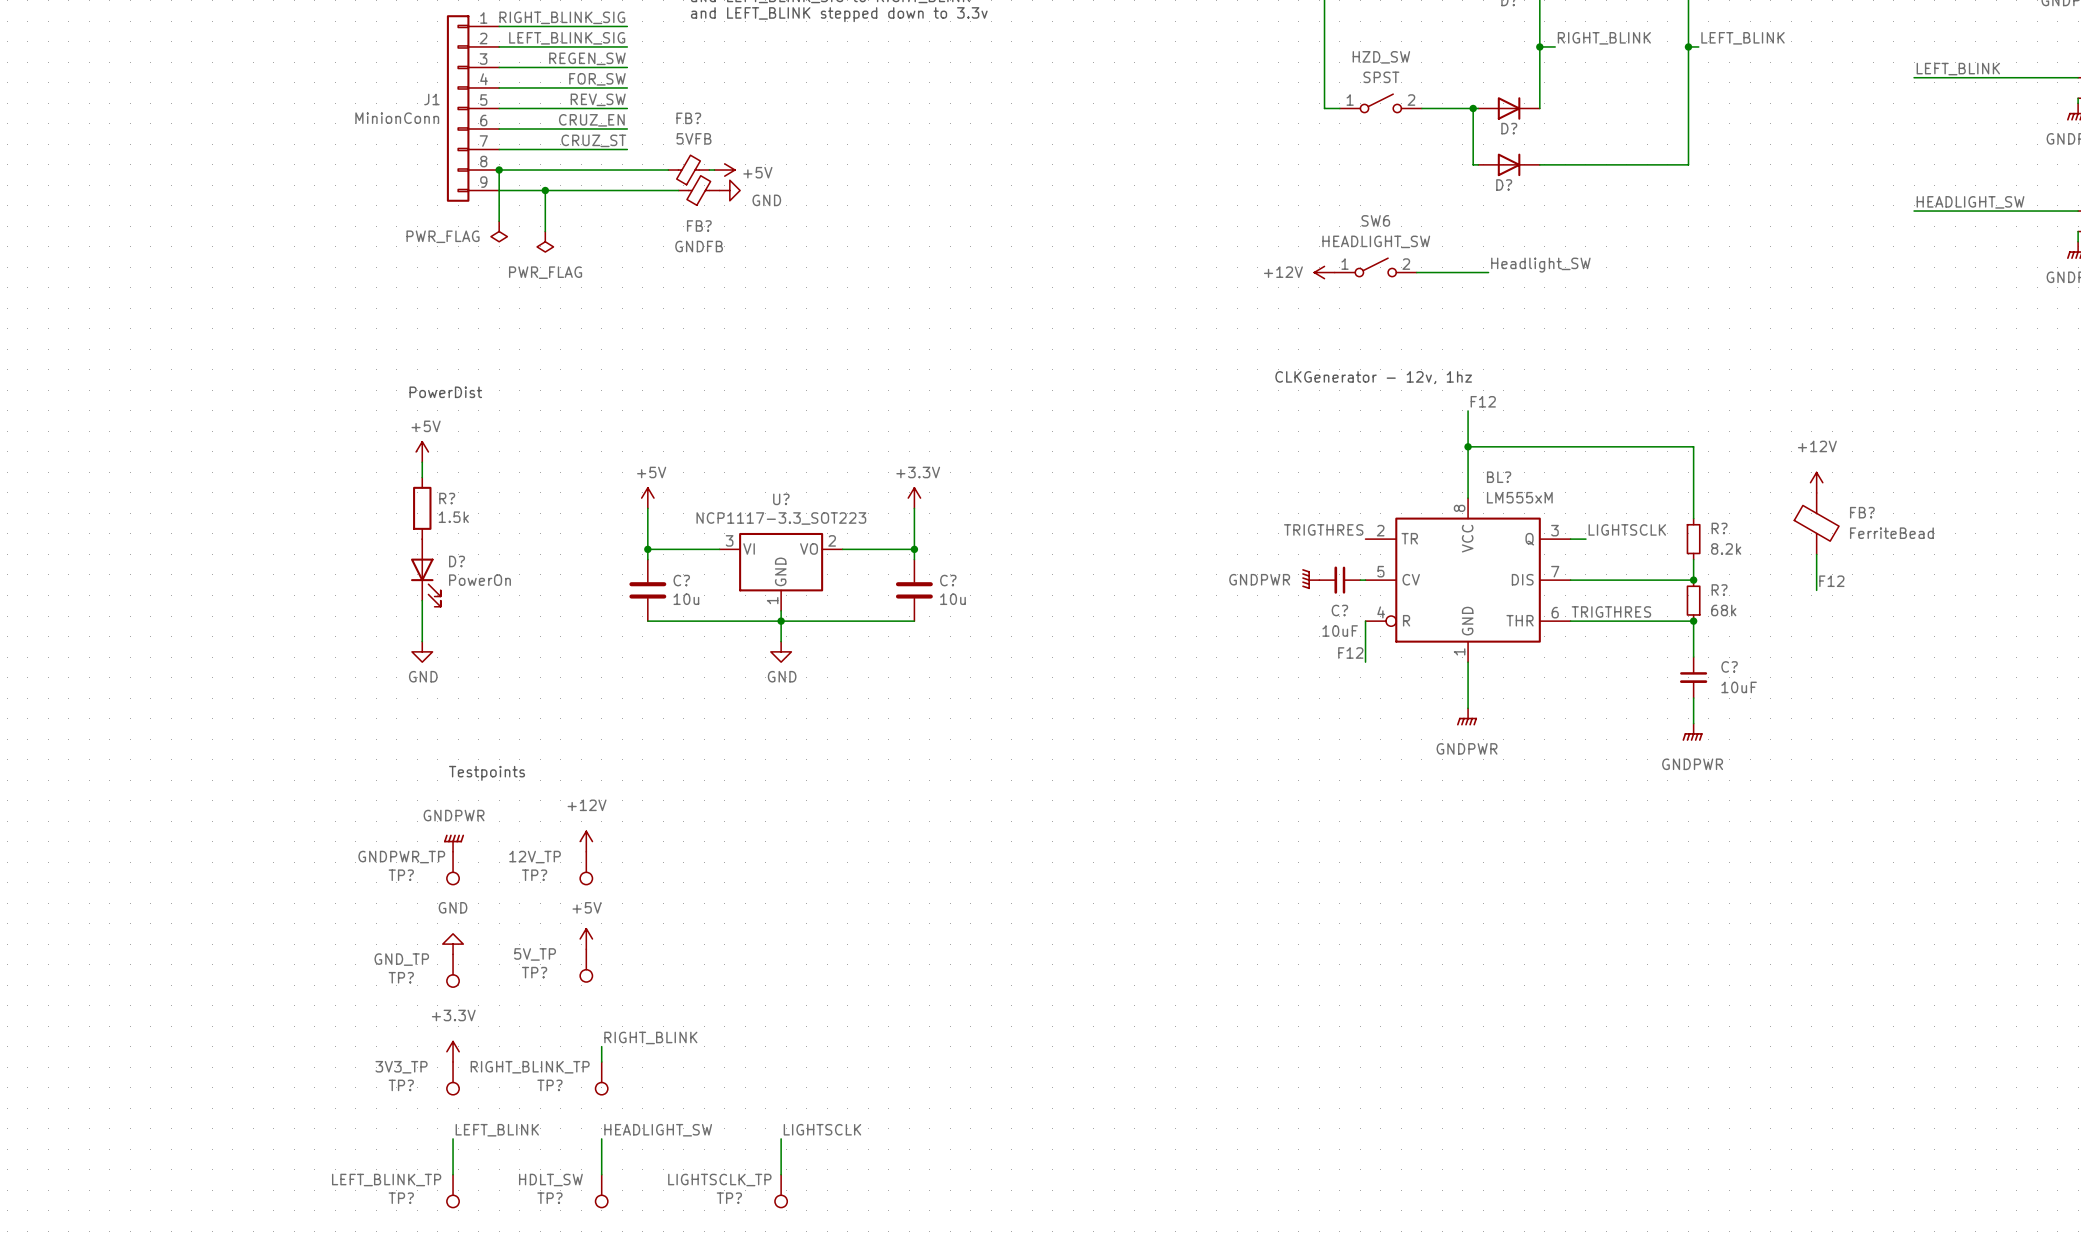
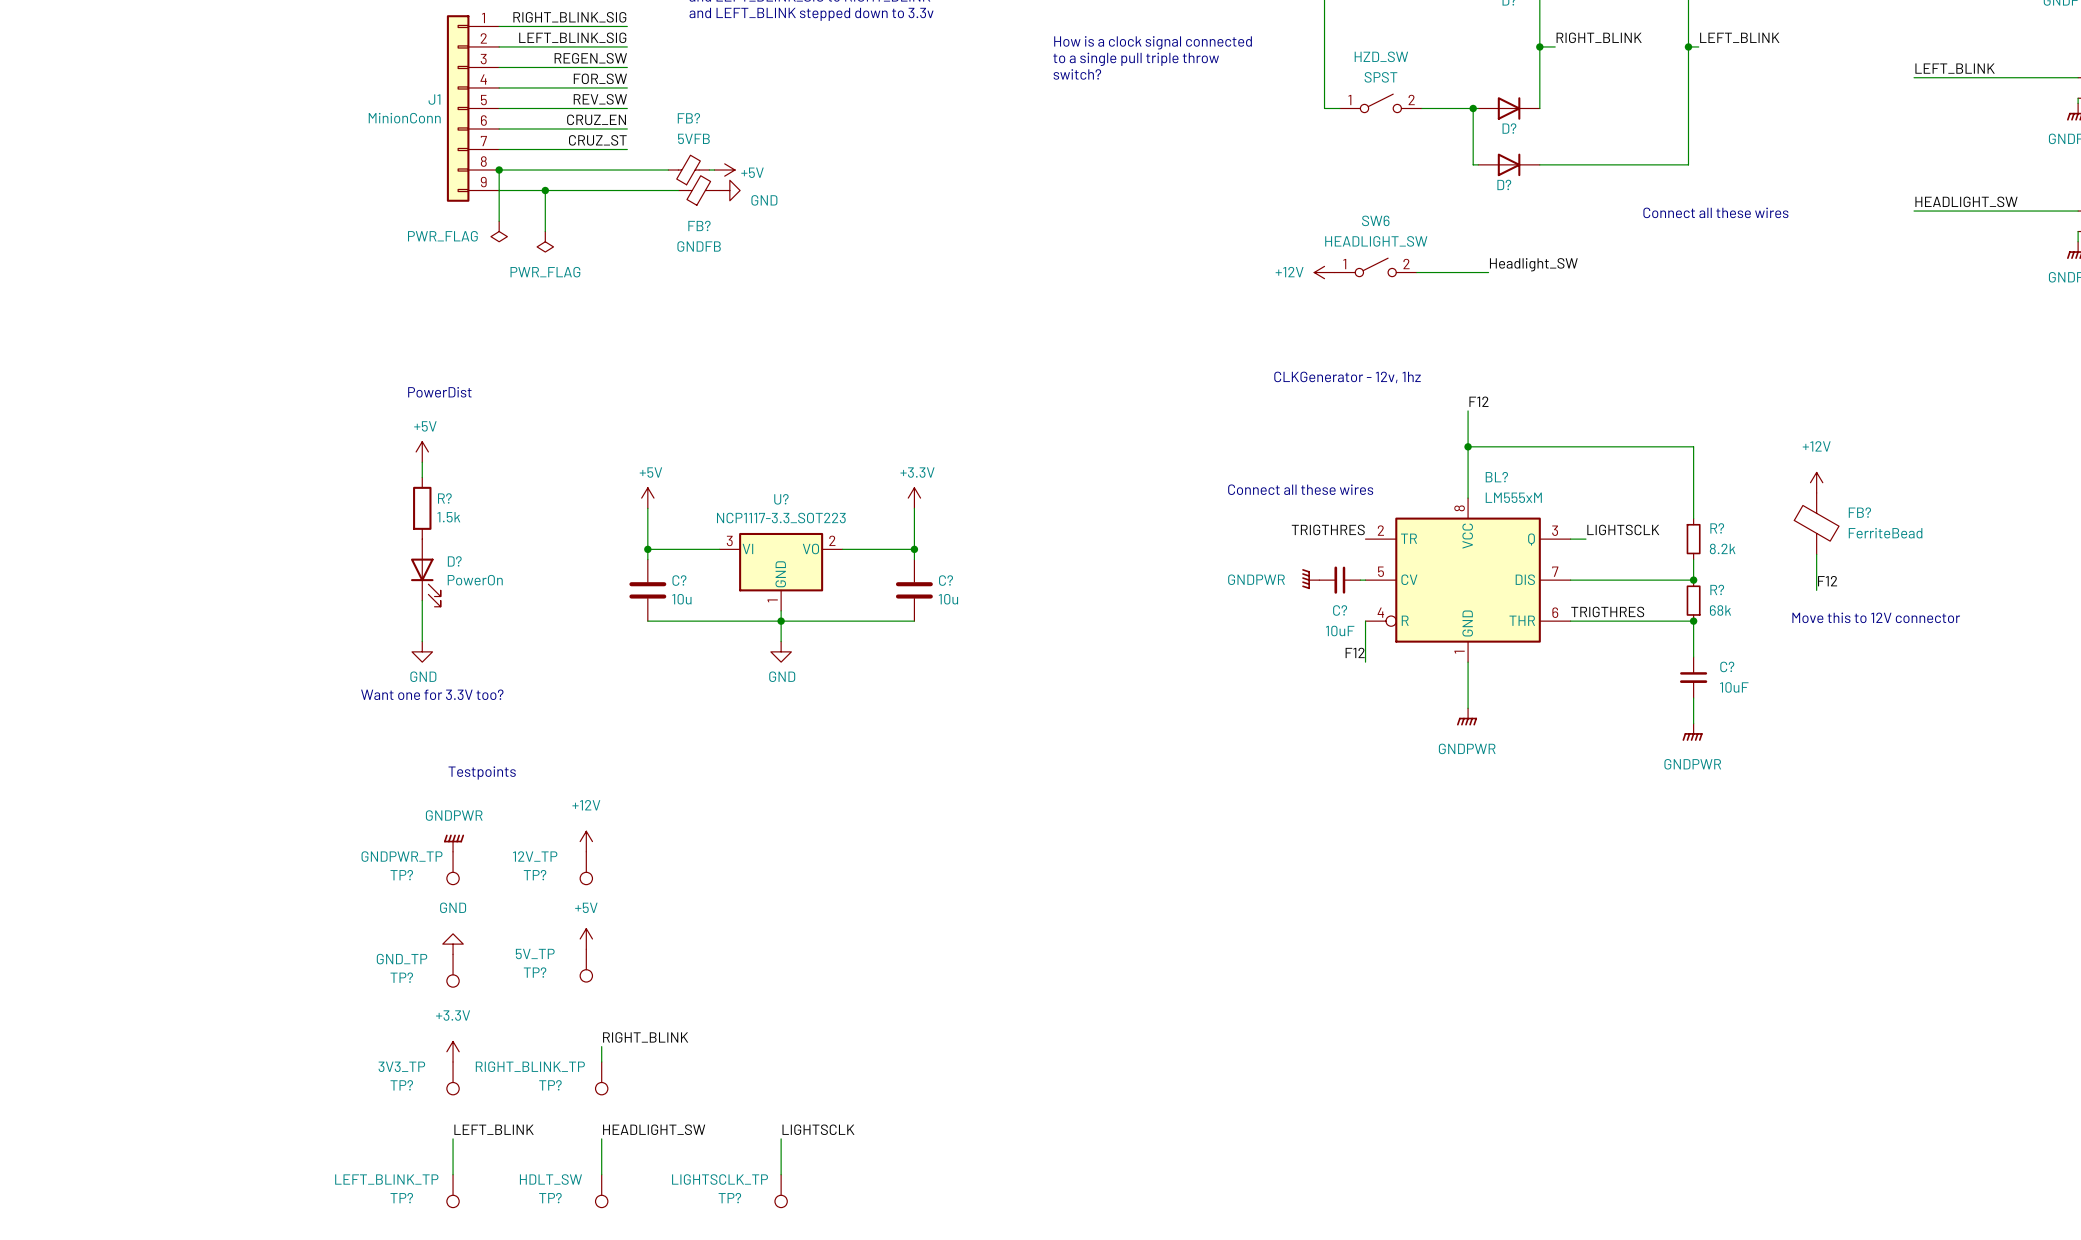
text: none -> How is a clock signal connected (1153, 42)
text: none -> to a single pull triple throw (1136, 59)
text: none -> switch? (1077, 74)
text: none -> Connect all these wires (1715, 212)
text: none -> Connect all these wires (1300, 489)
text: none -> Move this to 12V connector (1876, 617)
text: none -> Want one for 3.3V too? (432, 694)

